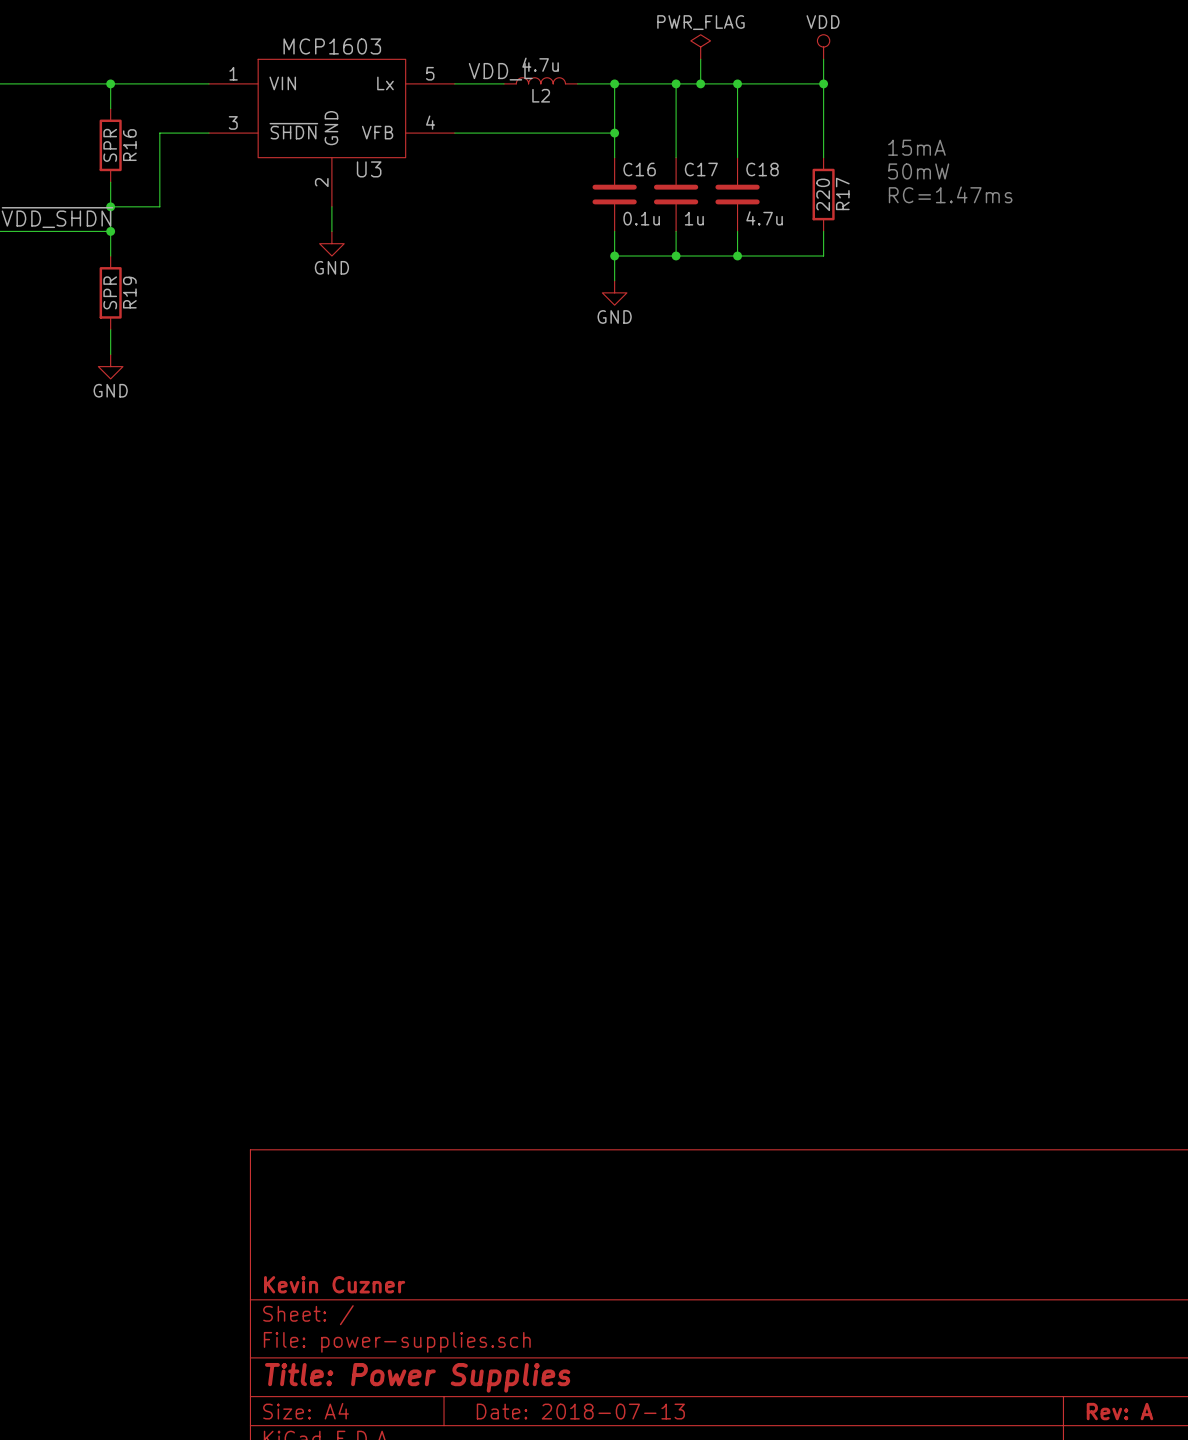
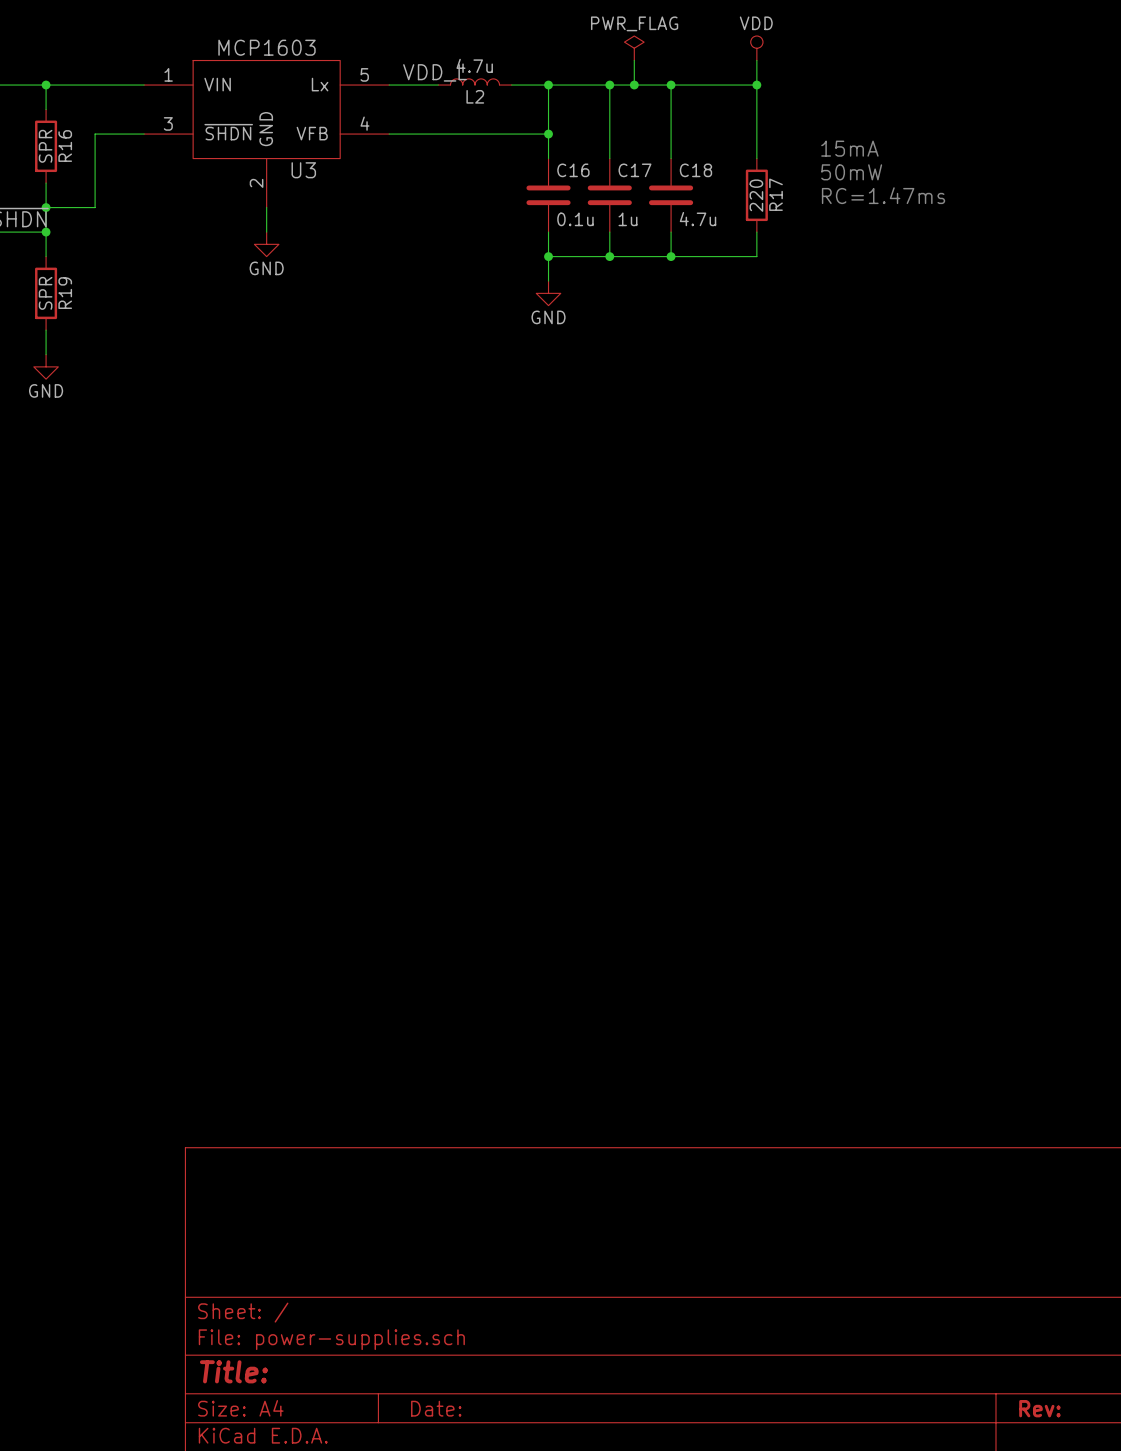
title block: Kevin Cuzner (334, 1284) -> none
title block: Title: Power Supplies (417, 1377) -> Title: (233, 1371)
title block: Date: 2018-07-13 (580, 1411) -> Date: (436, 1408)
title block: Rev: A (1119, 1411) -> Rev: (1039, 1408)

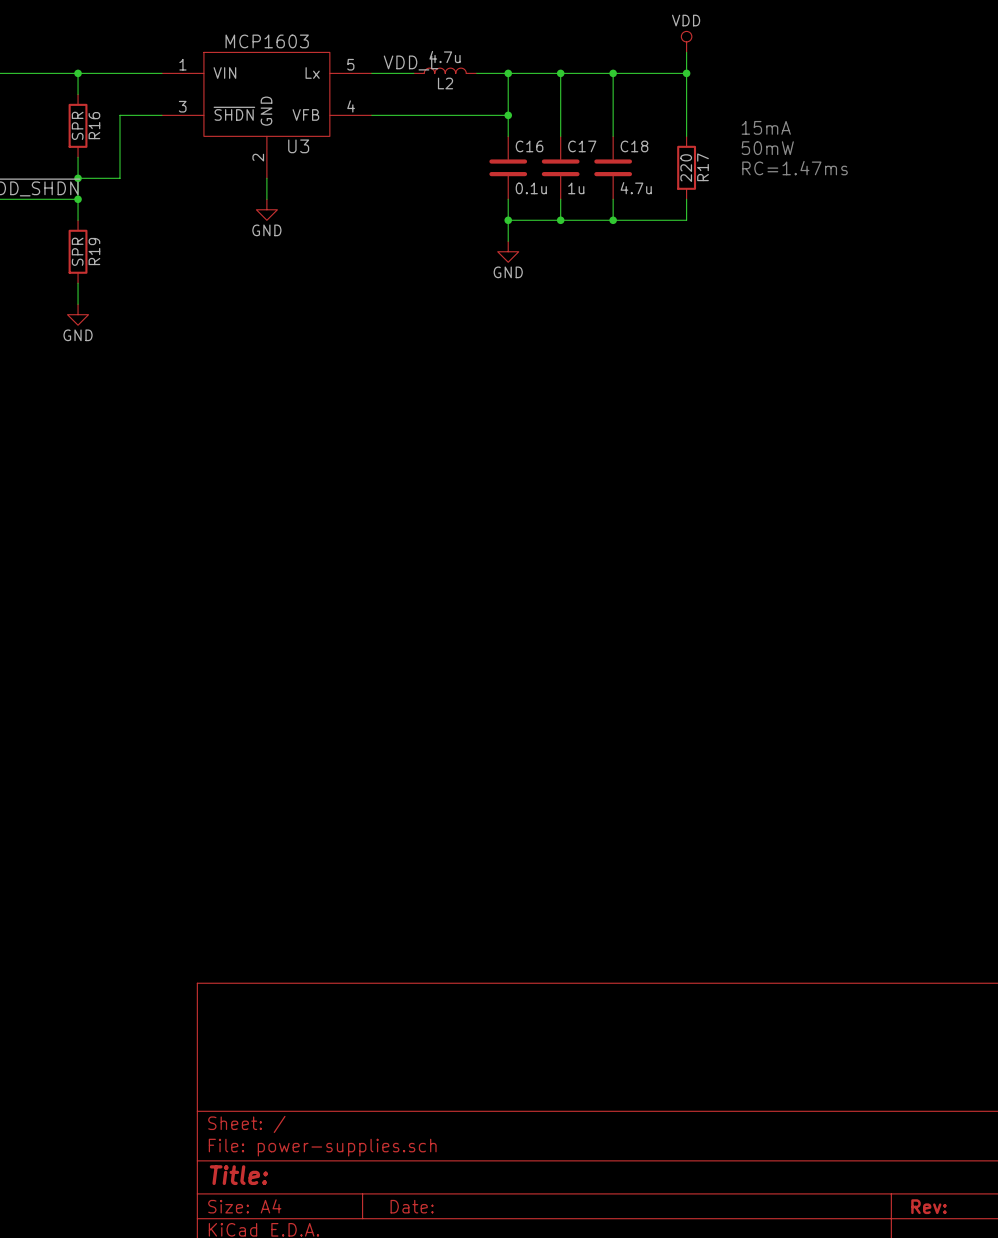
power symbol: PWR_FLAG (634, 48) -> none
wire: (634, 60) (634, 85) -> none
junction: (634, 85) -> none

